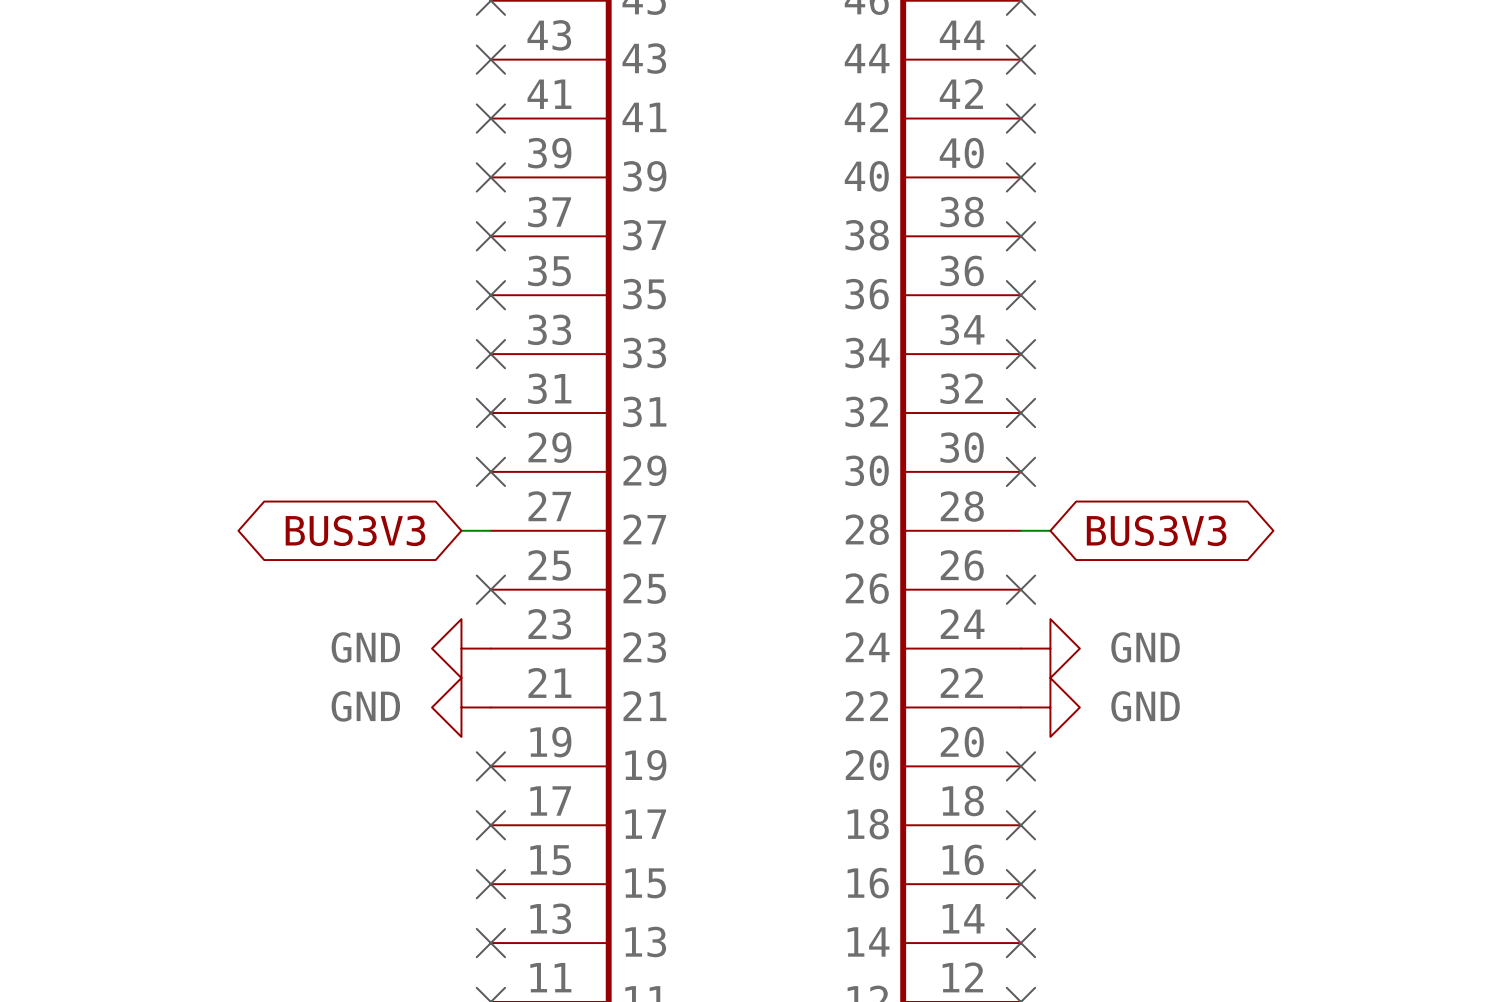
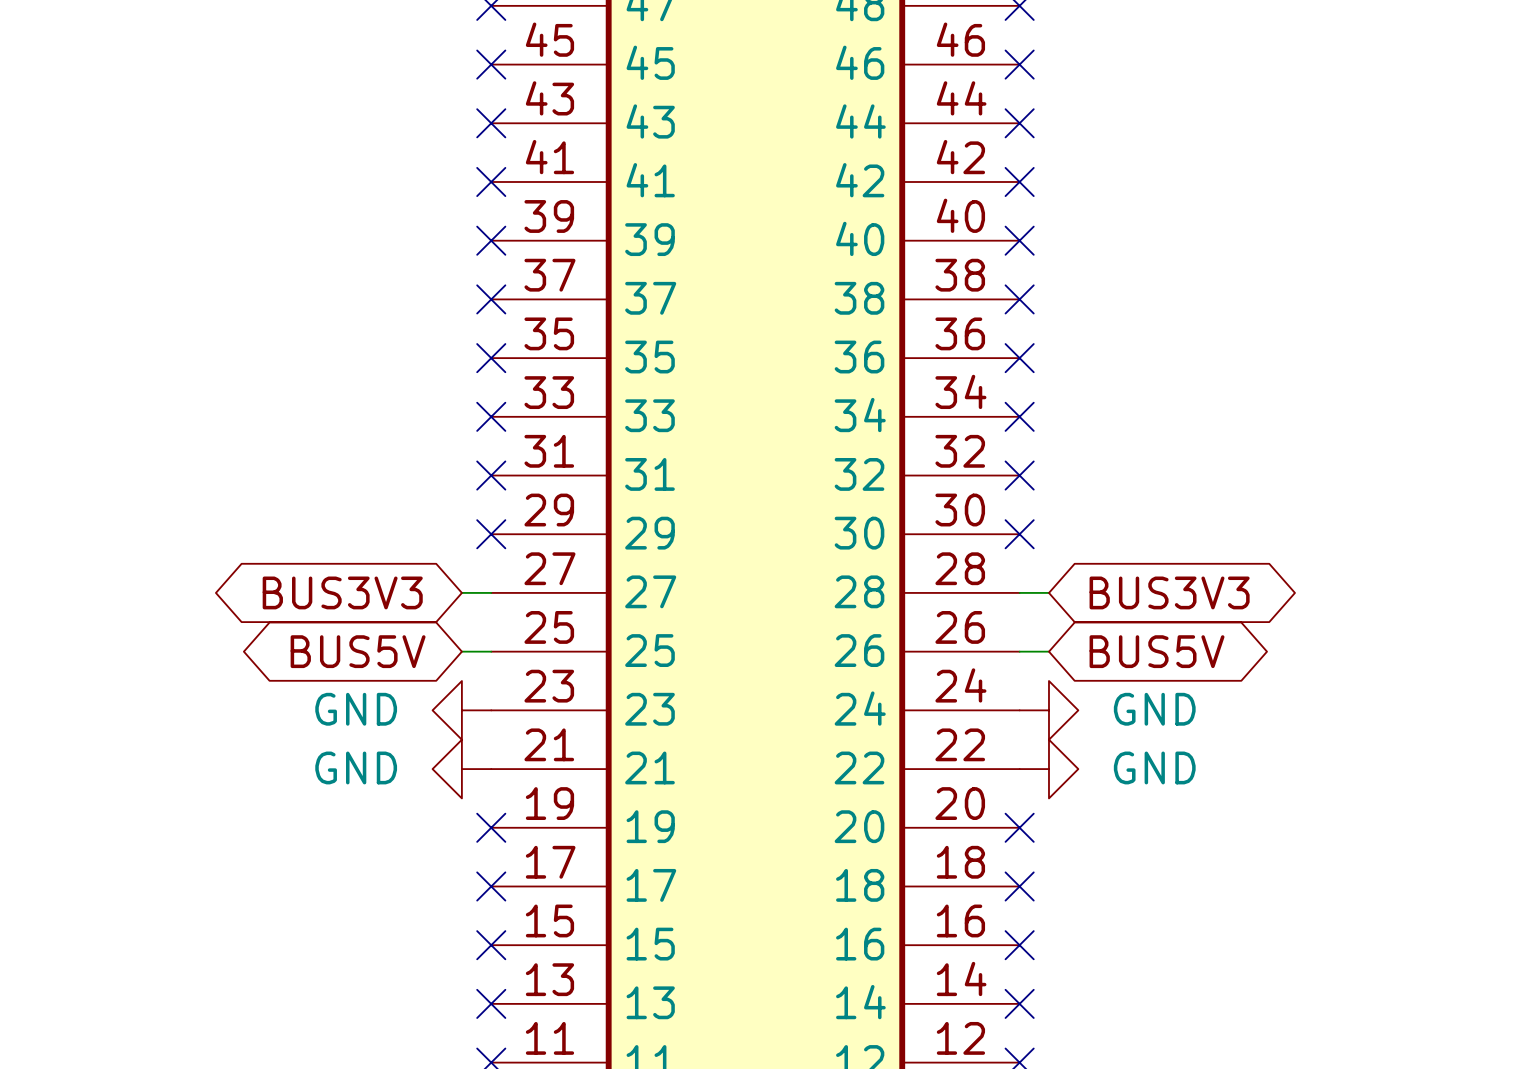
global label: none -> BUS5V (358, 651)
wire: none -> (461, 651) (491, 651)
no-connect mark: (490, 589) -> none
wire: none -> (1019, 651) (1048, 651)
no-connect mark: (1020, 589) -> none
global label: none -> BUS5V (1157, 651)

